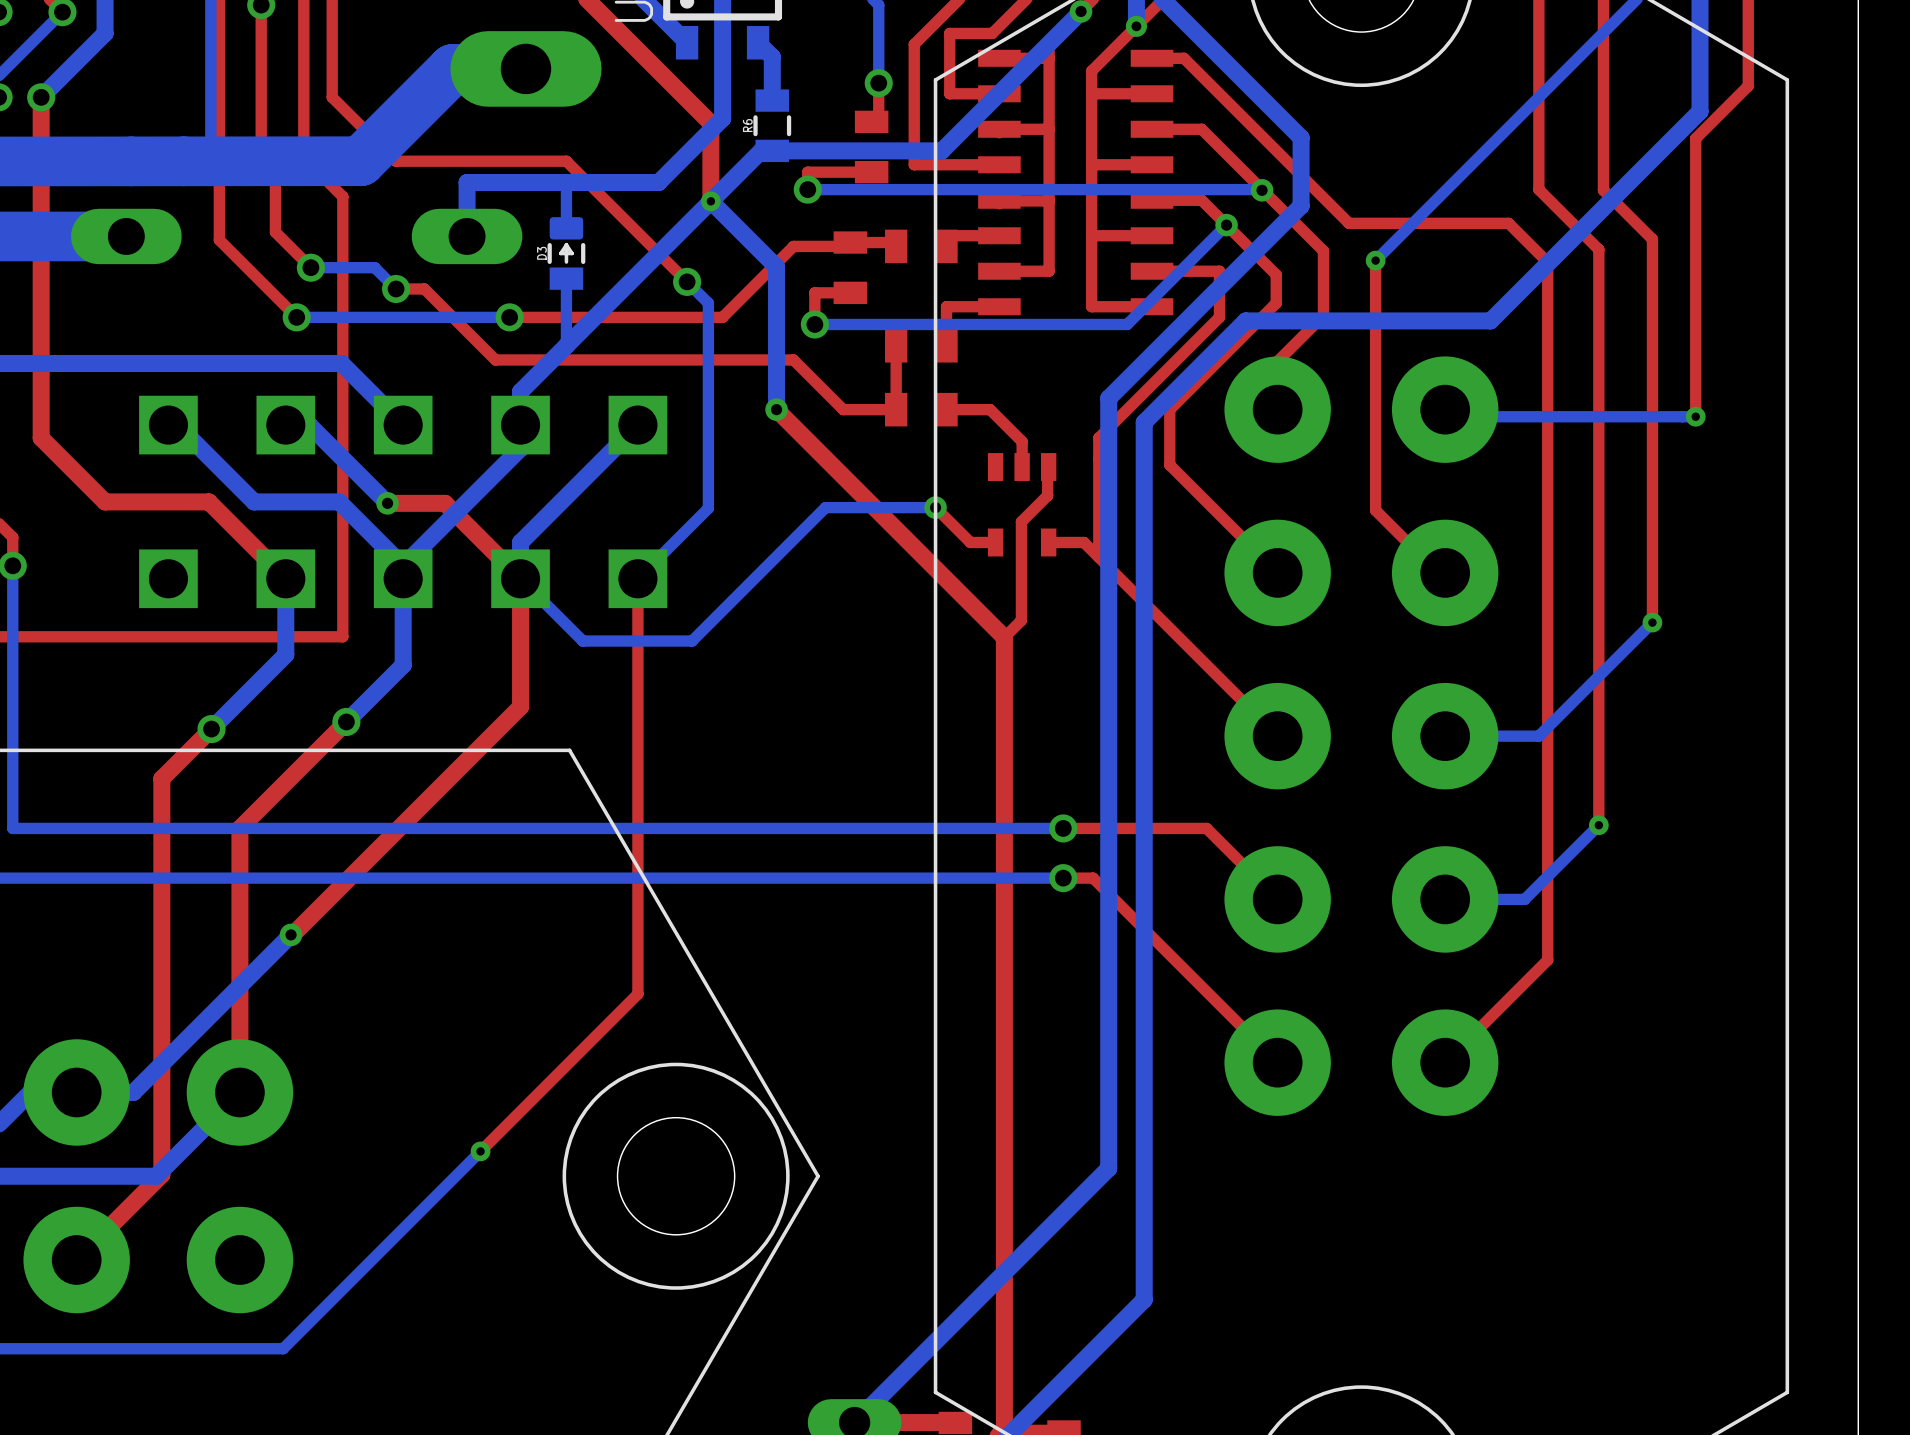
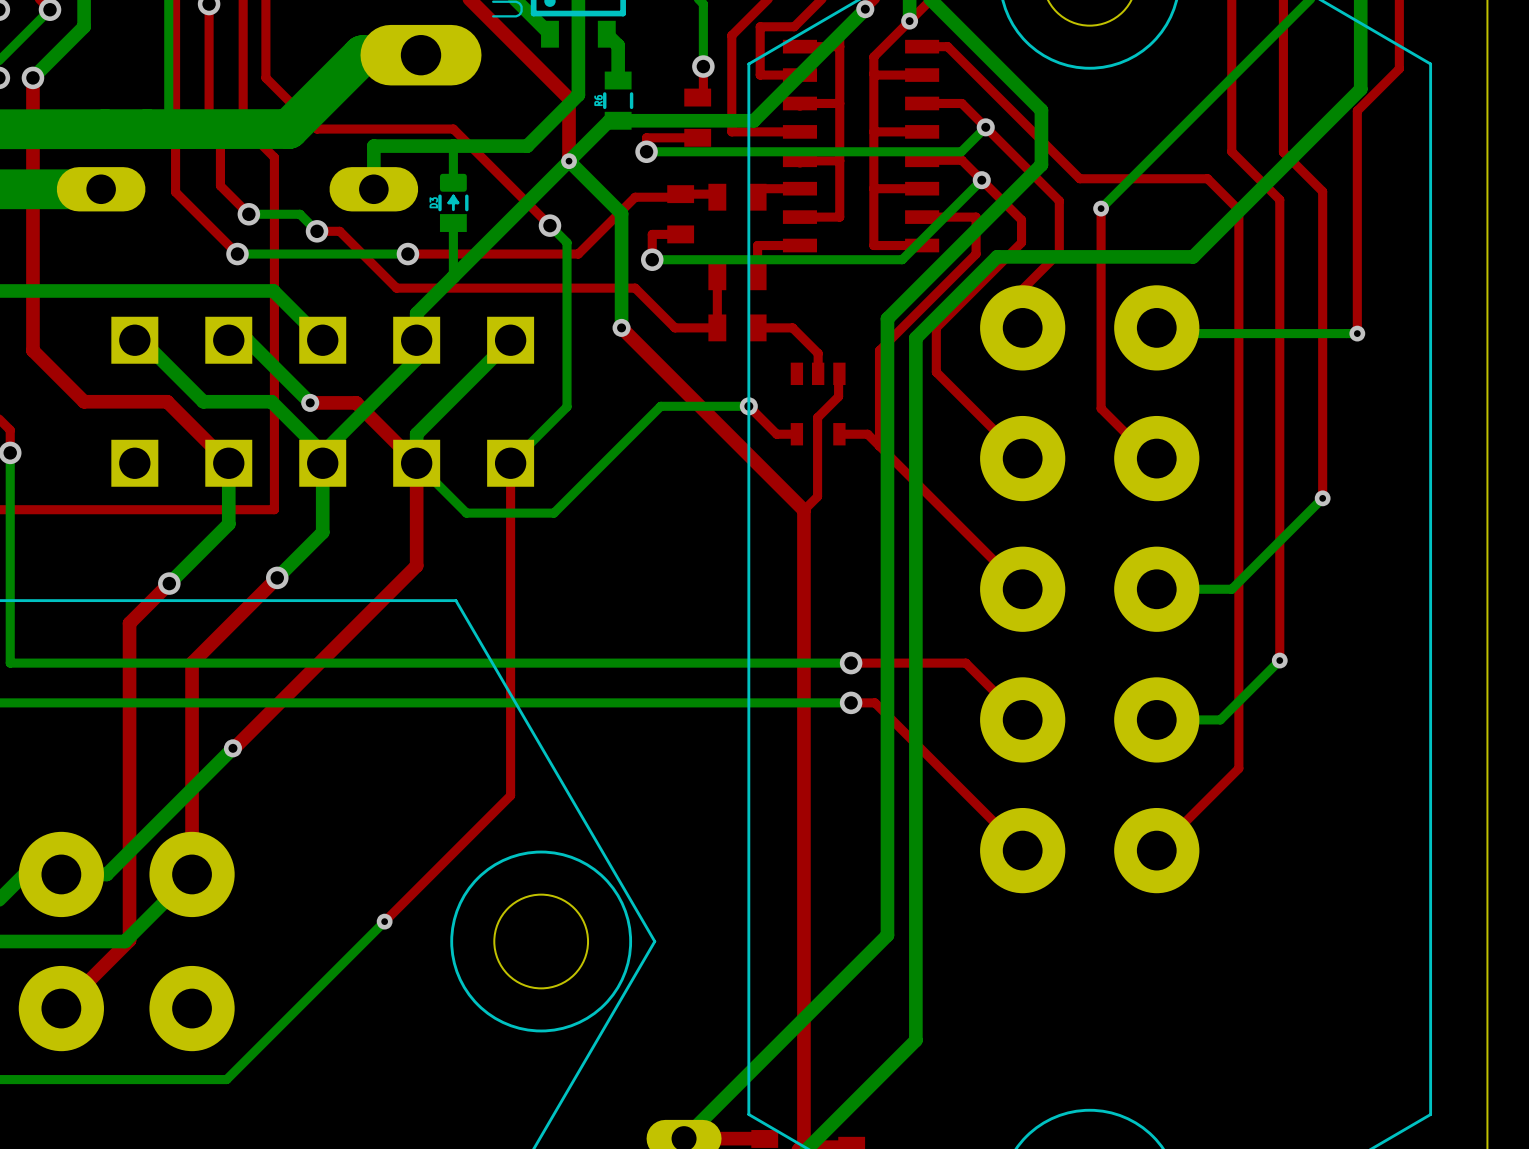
bottom track: (1201, 189) (1262, 190) -> (961, 151) (985, 127)
via position: (1262, 190) -> (985, 127)

